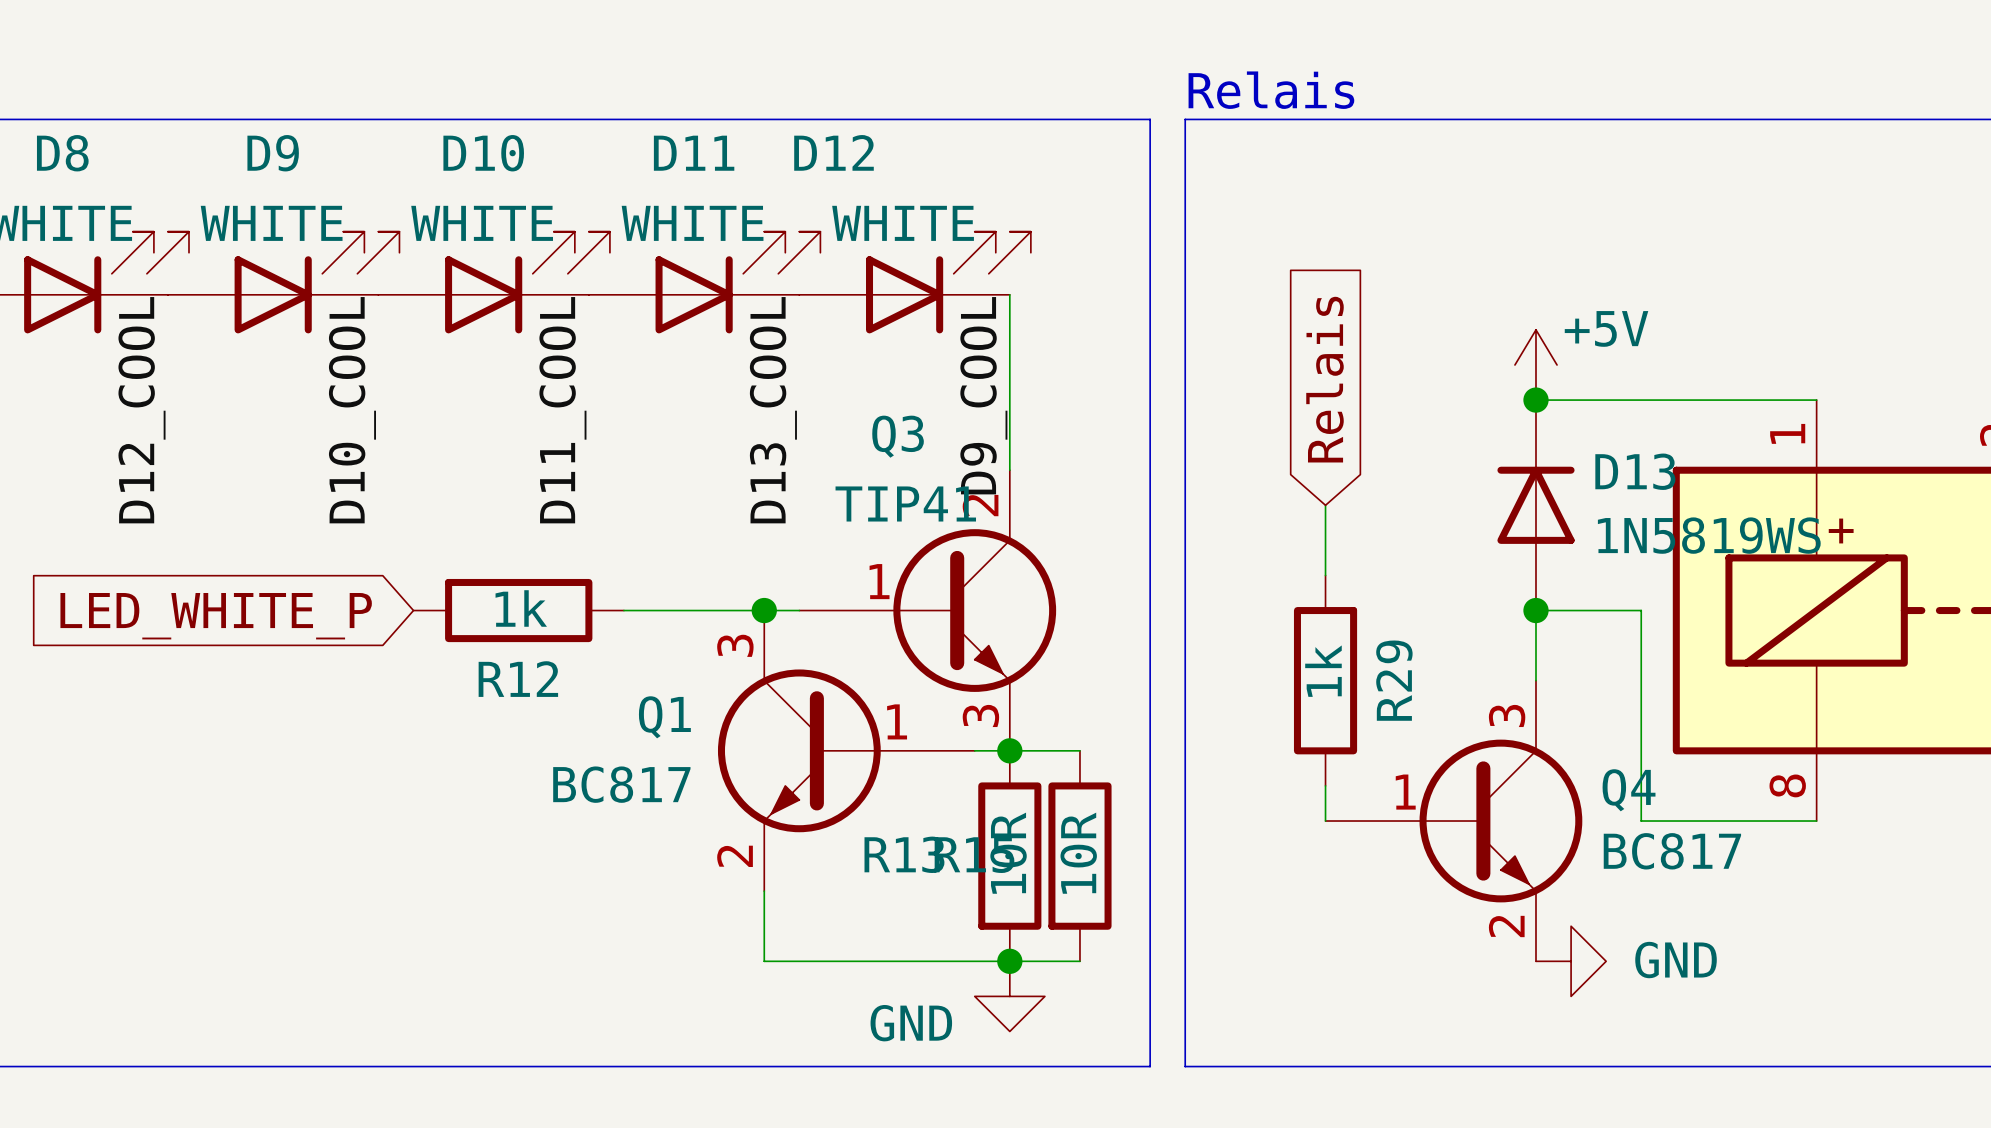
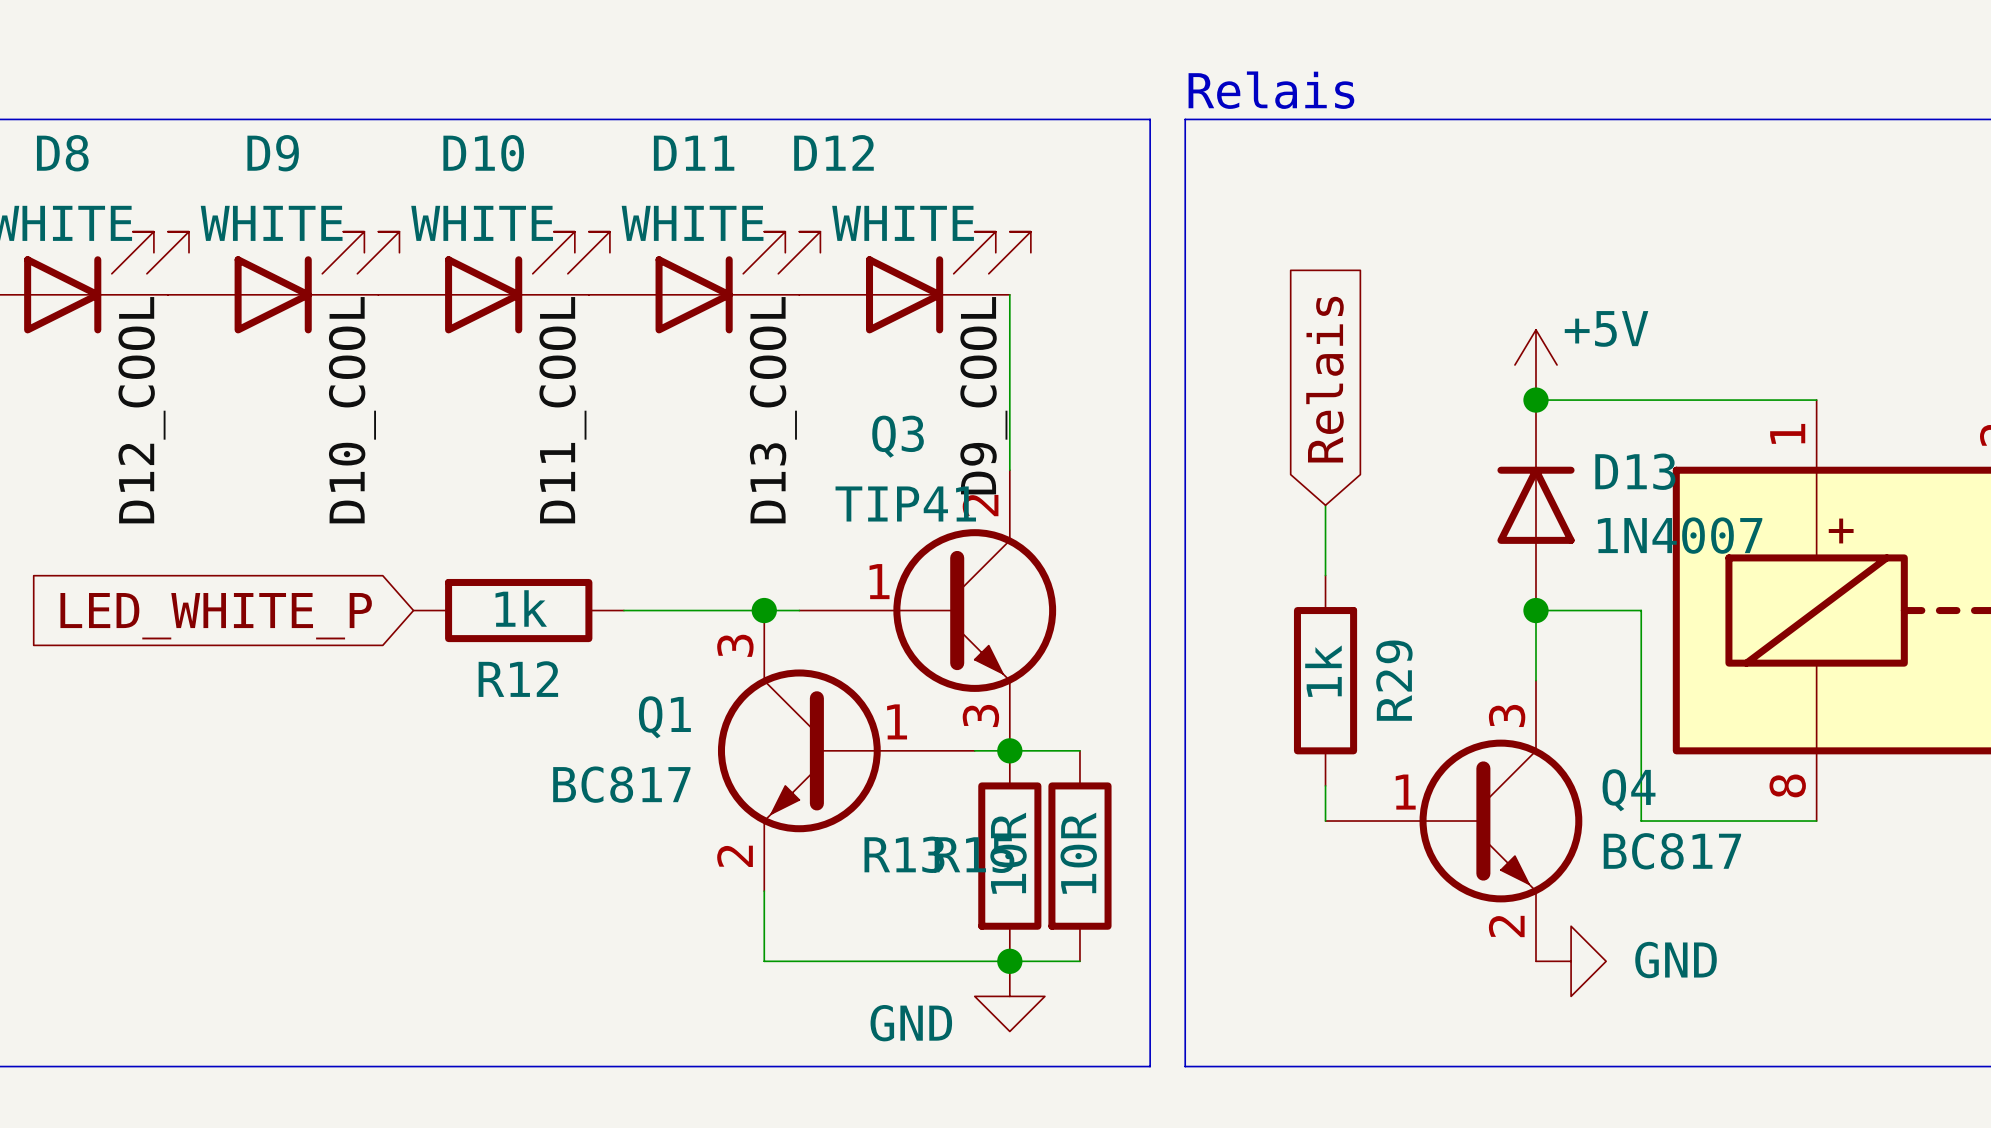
D13 value: 1N5819WS (1709, 535) -> 1N4007 (1680, 535)

